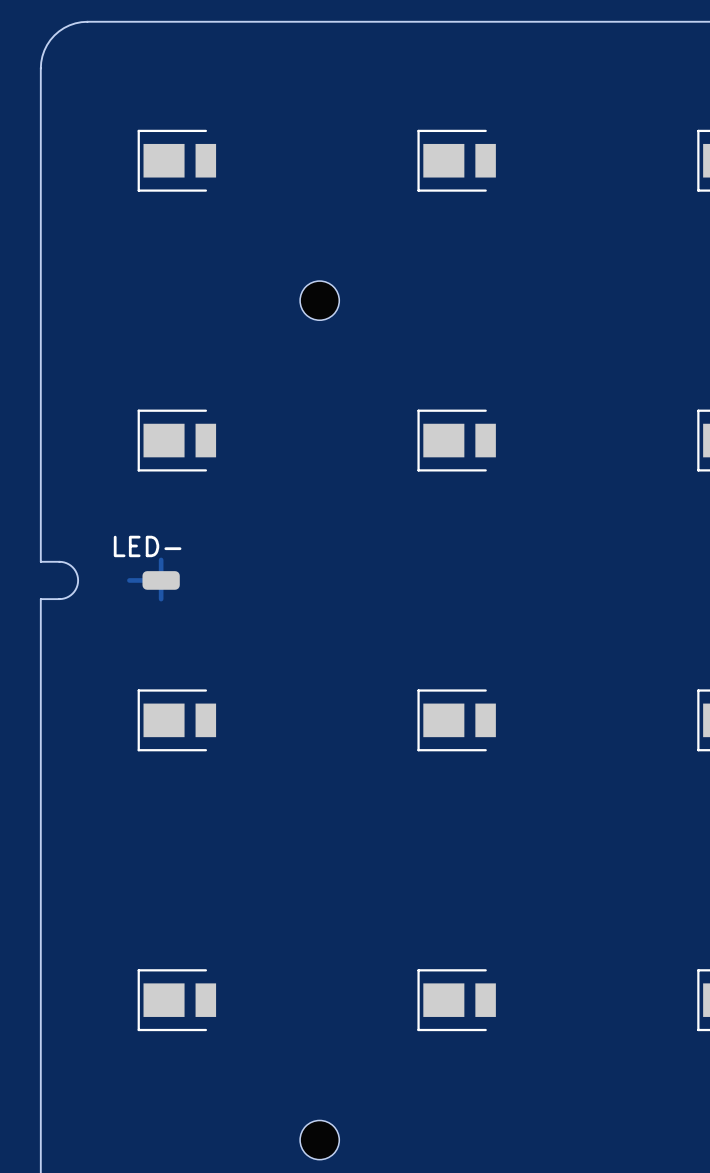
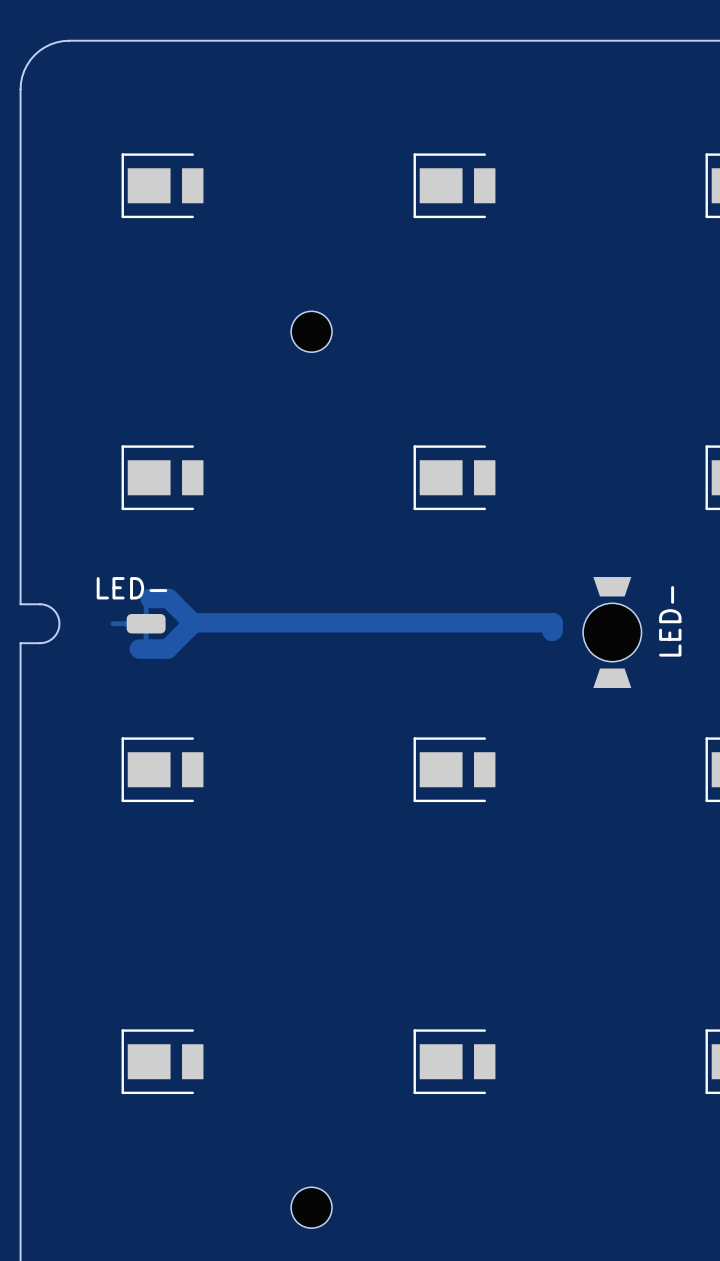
track: none -> (150, 598) (168, 598) (188, 618) (188, 627) (167, 649) (139, 649)
text: none -> LED- (670, 621)
track: none -> (188, 622) (552, 622) (551, 631)
part: none -> (612, 632)

